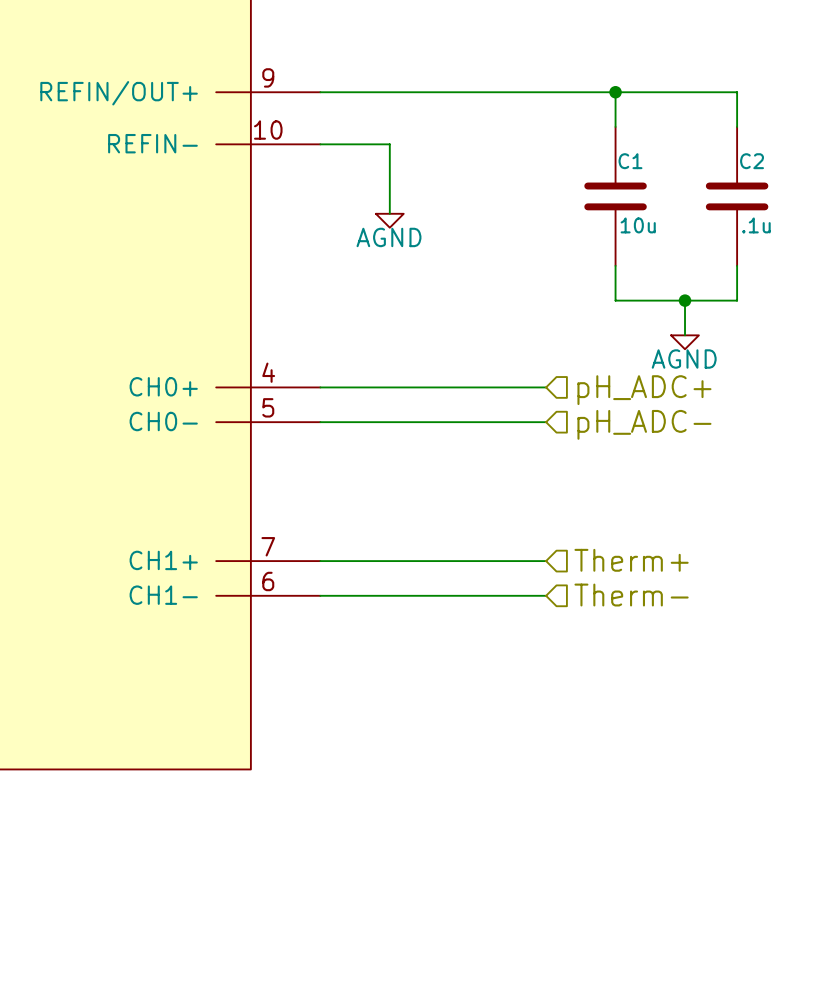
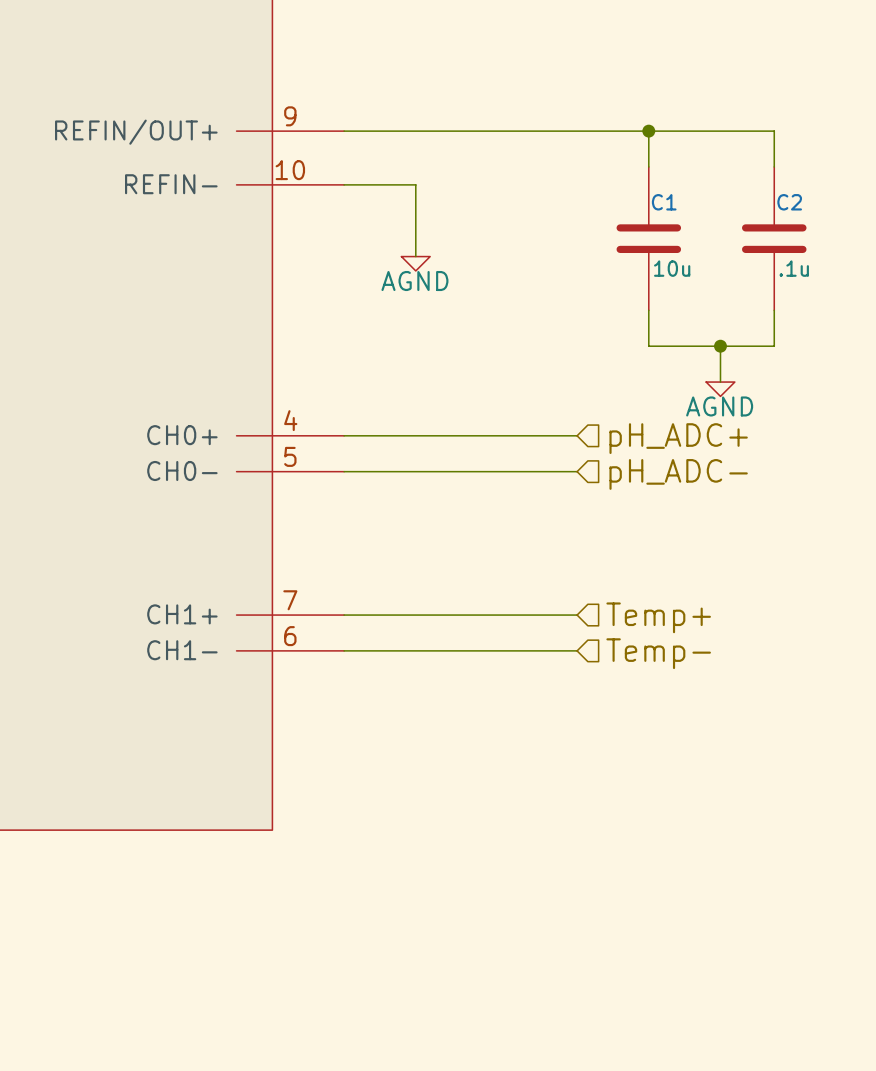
hierarchical label: Therm+ (631, 560) -> Temp+ (658, 617)
hierarchical label: Therm- (631, 595) -> Temp- (658, 653)

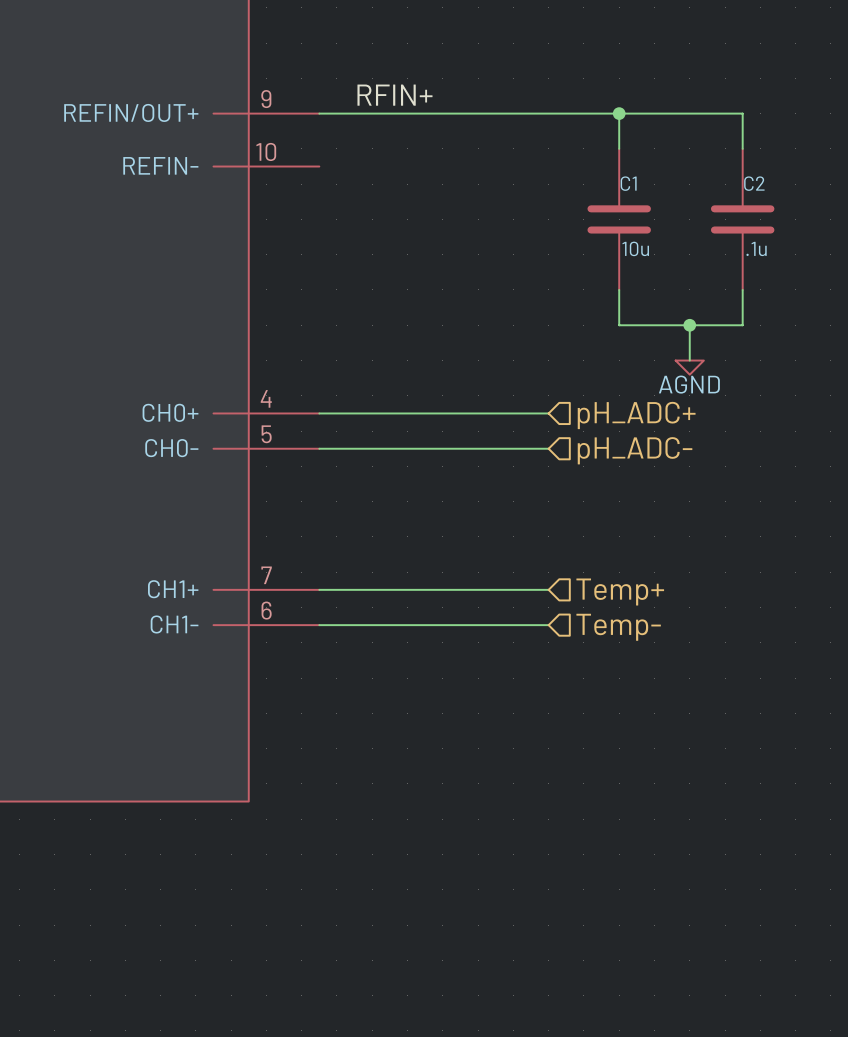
label: none -> RFIN+ (394, 95)
wire: (344, 184) (415, 184) (415, 256) -> none
power symbol: AGND (415, 263) -> none

